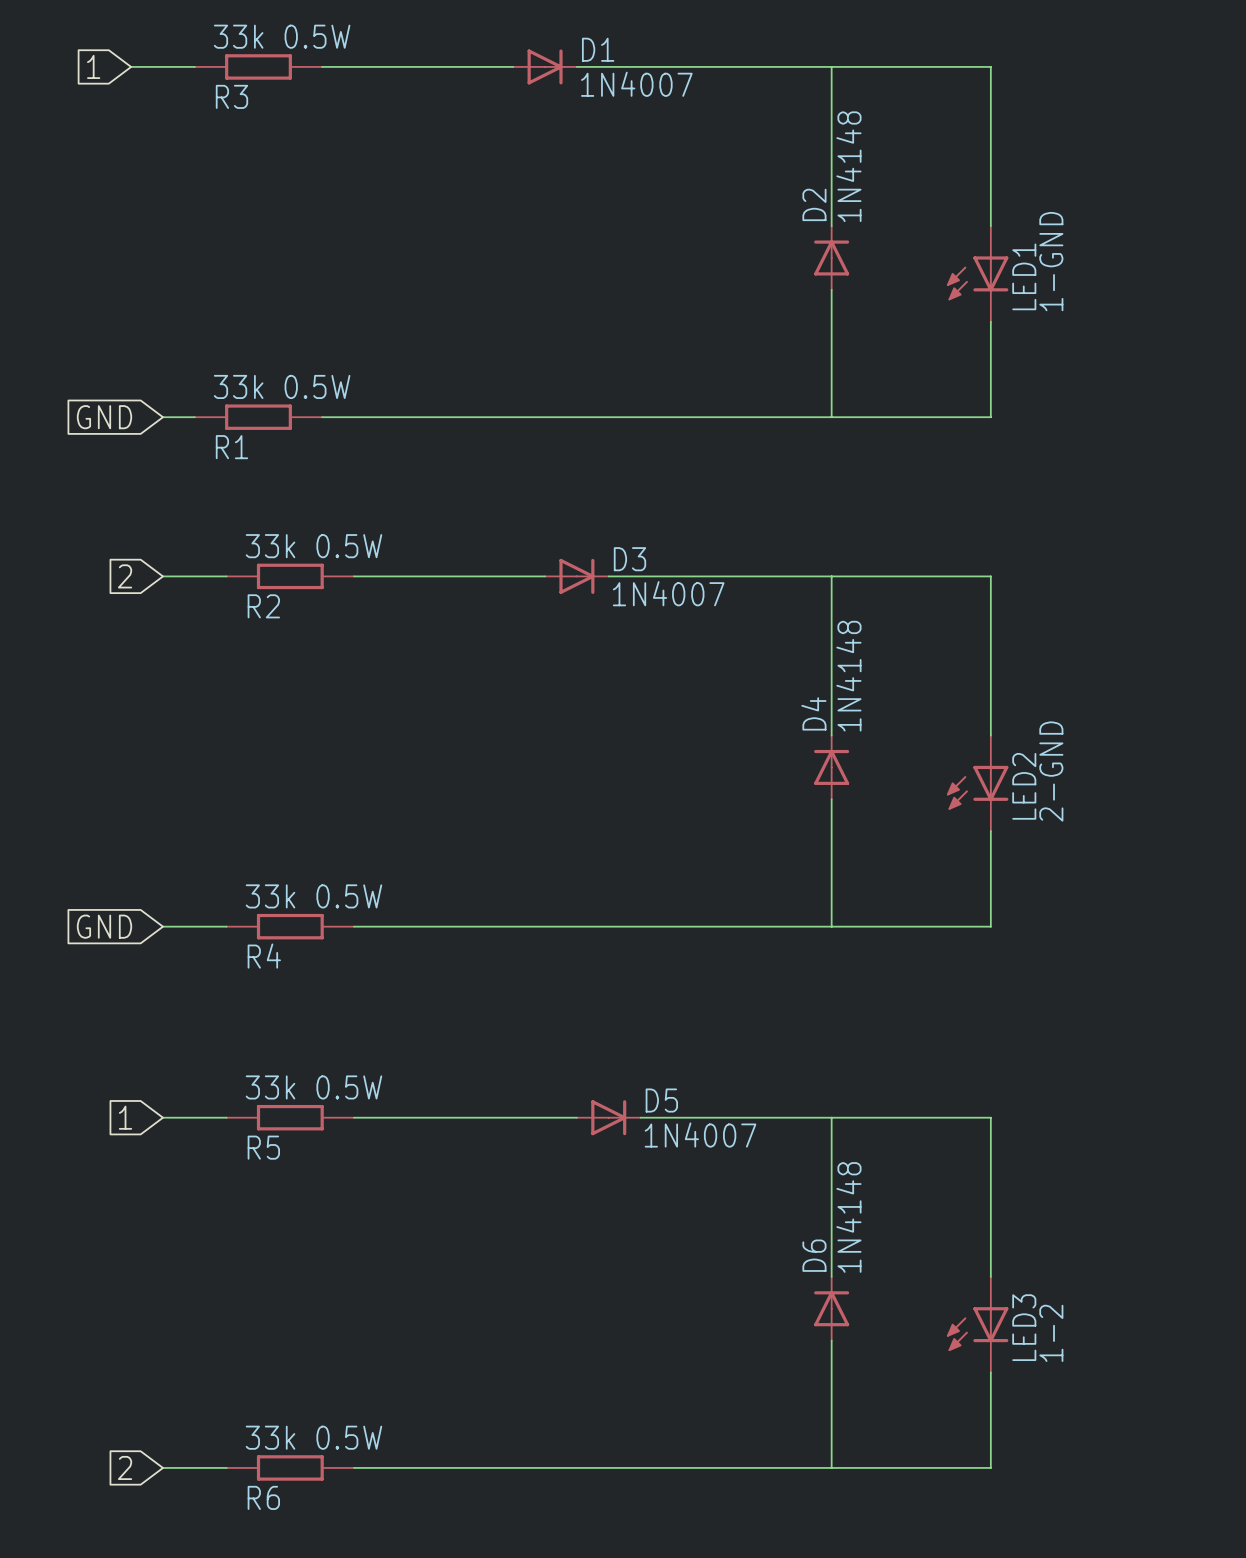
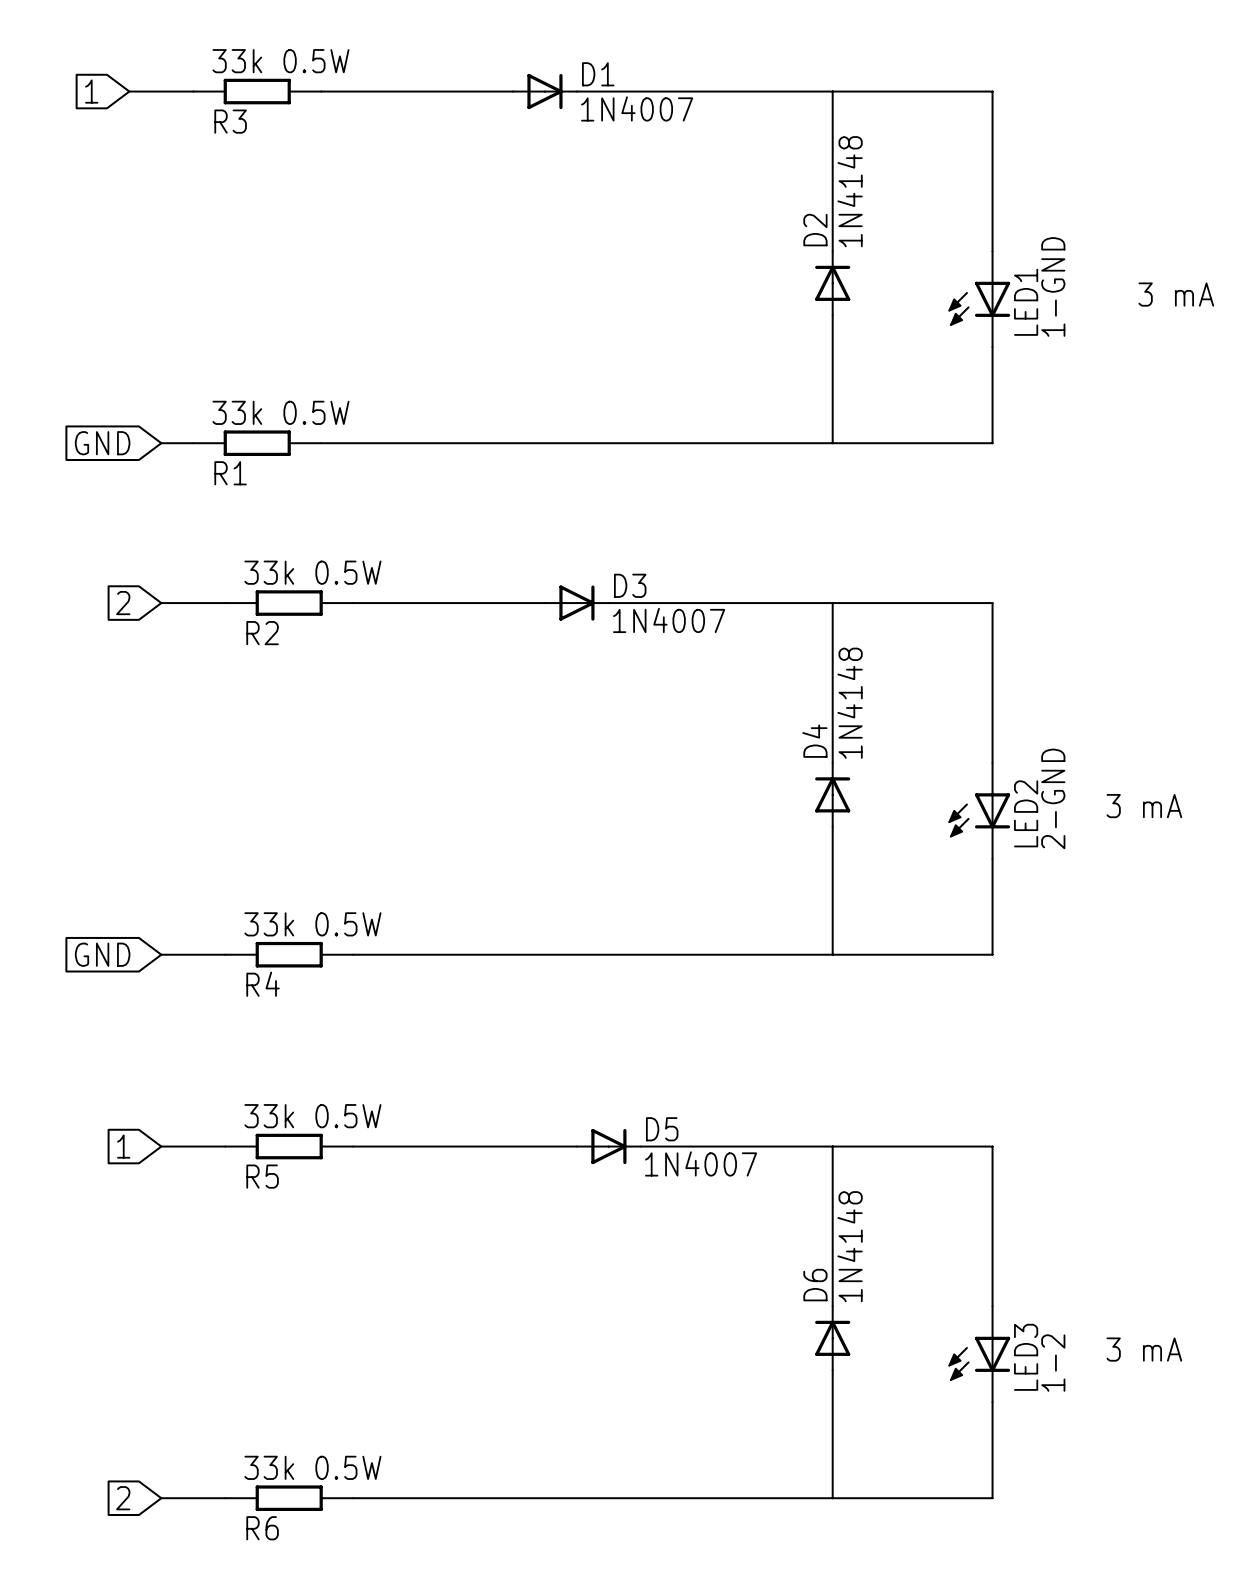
text: none -> 3 mA (1176, 294)
text: none -> 3 mA (1144, 806)
text: none -> 3 mA (1144, 1349)

